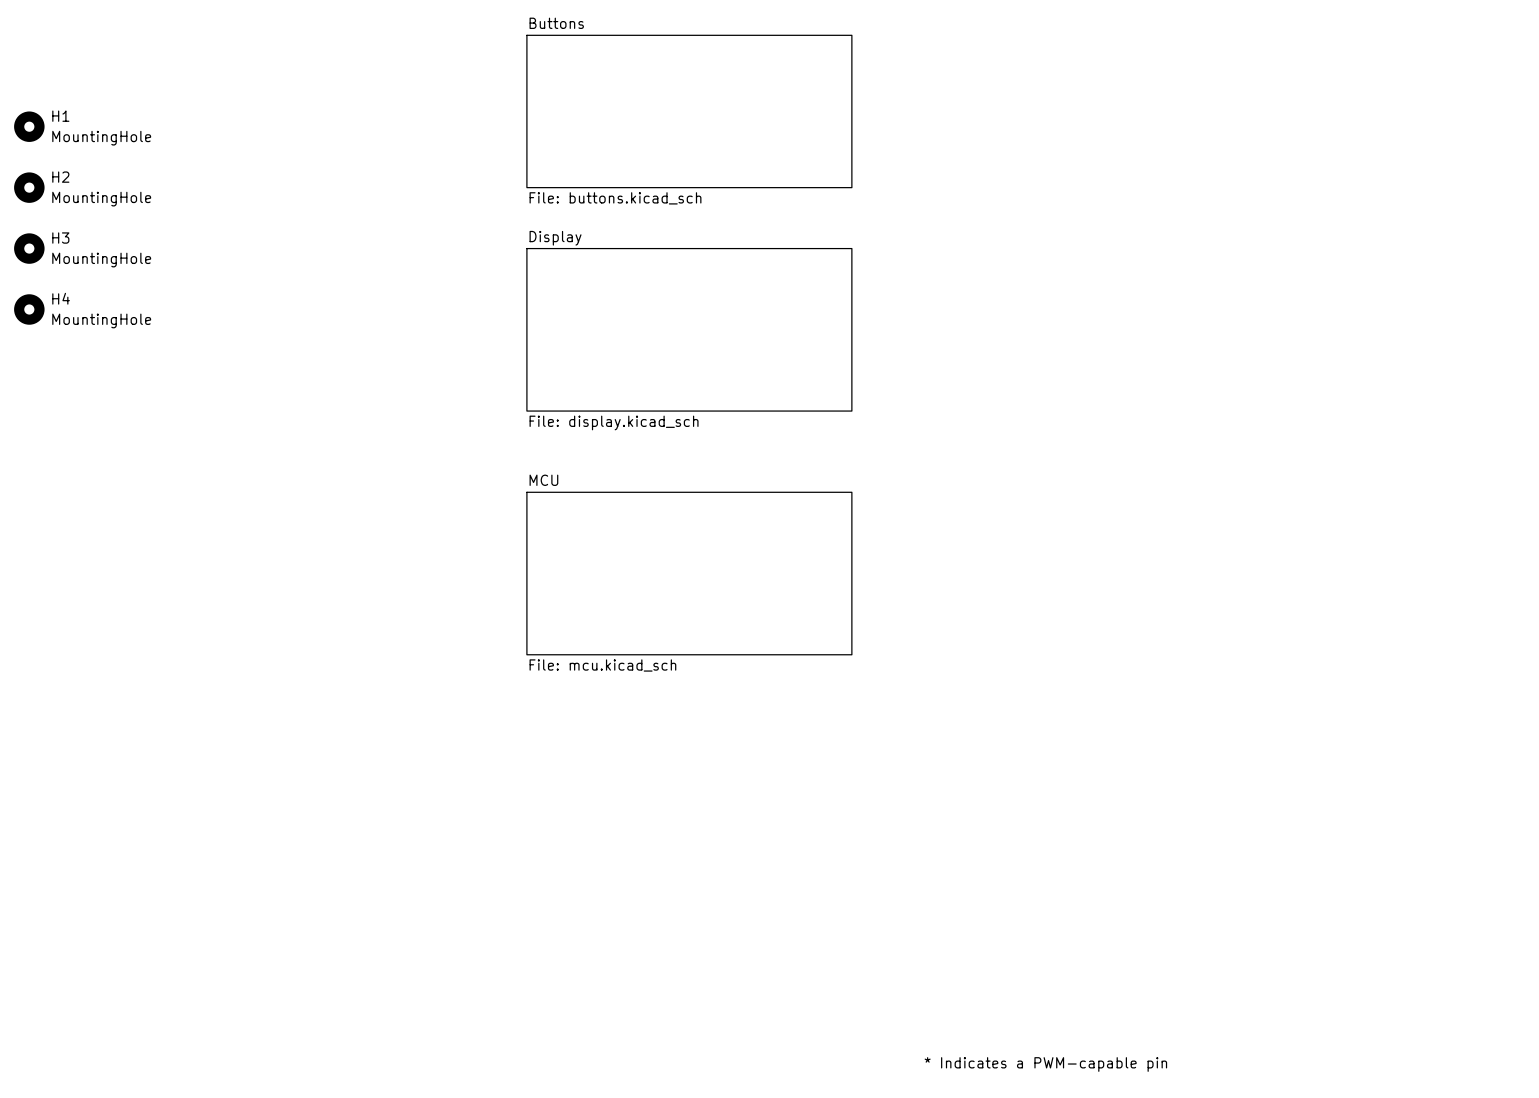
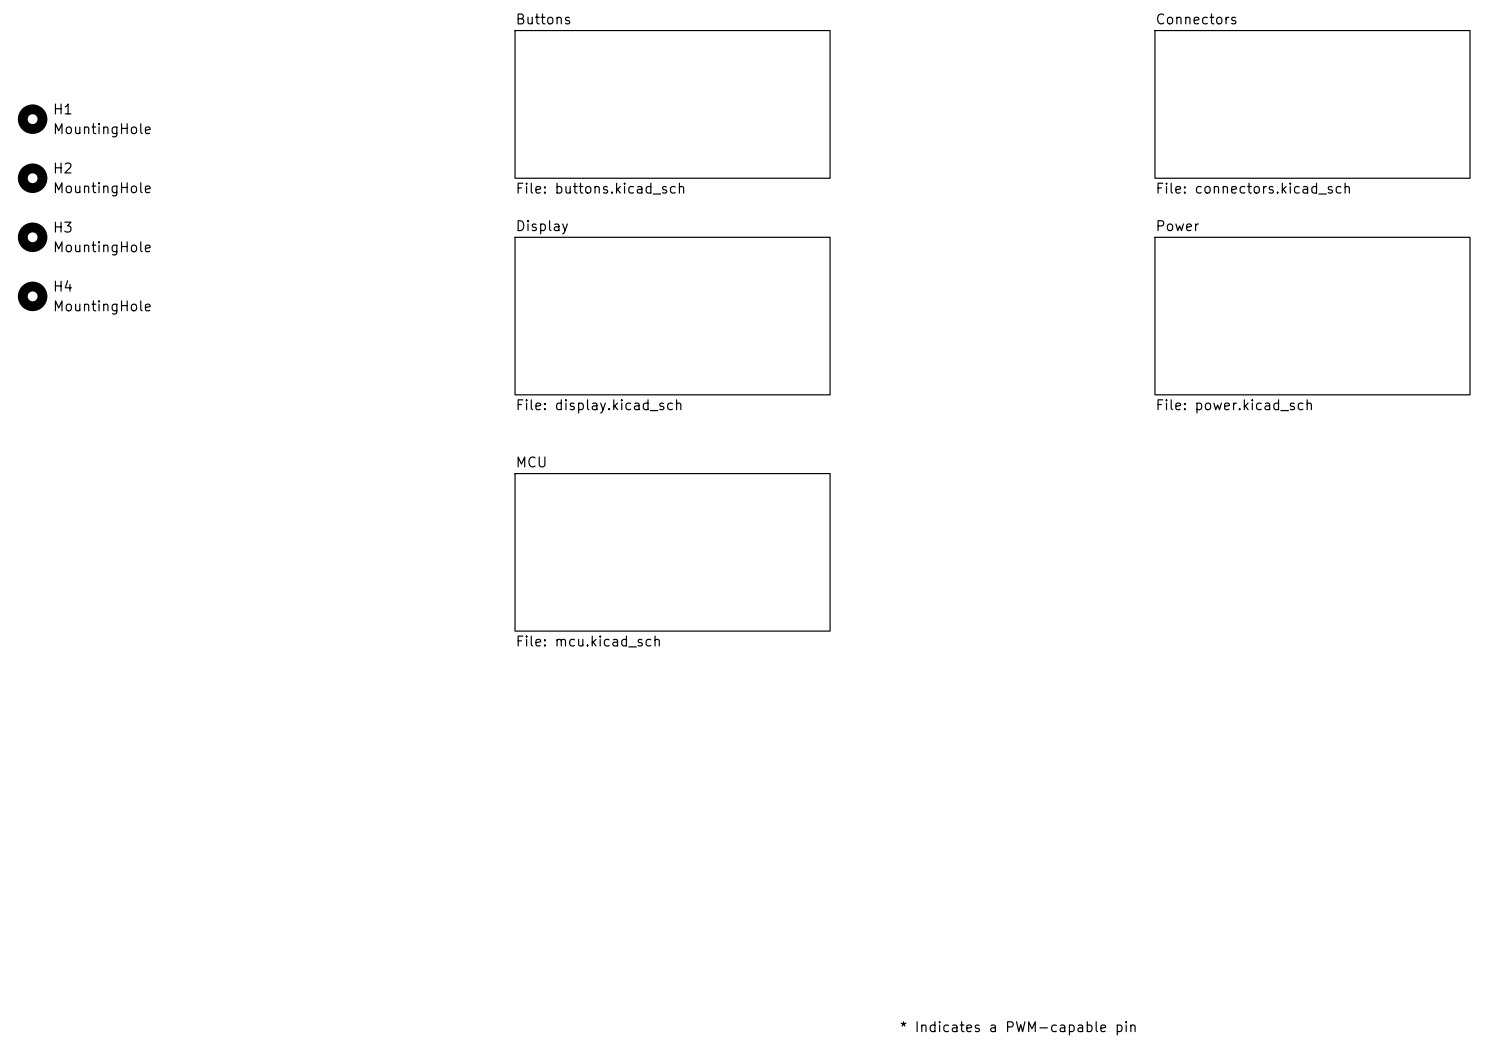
sheet Connectors: none -> File: connectors.kicad_sch (1312, 104)
sheet Power: none -> File: power.kicad_sch (1312, 316)

